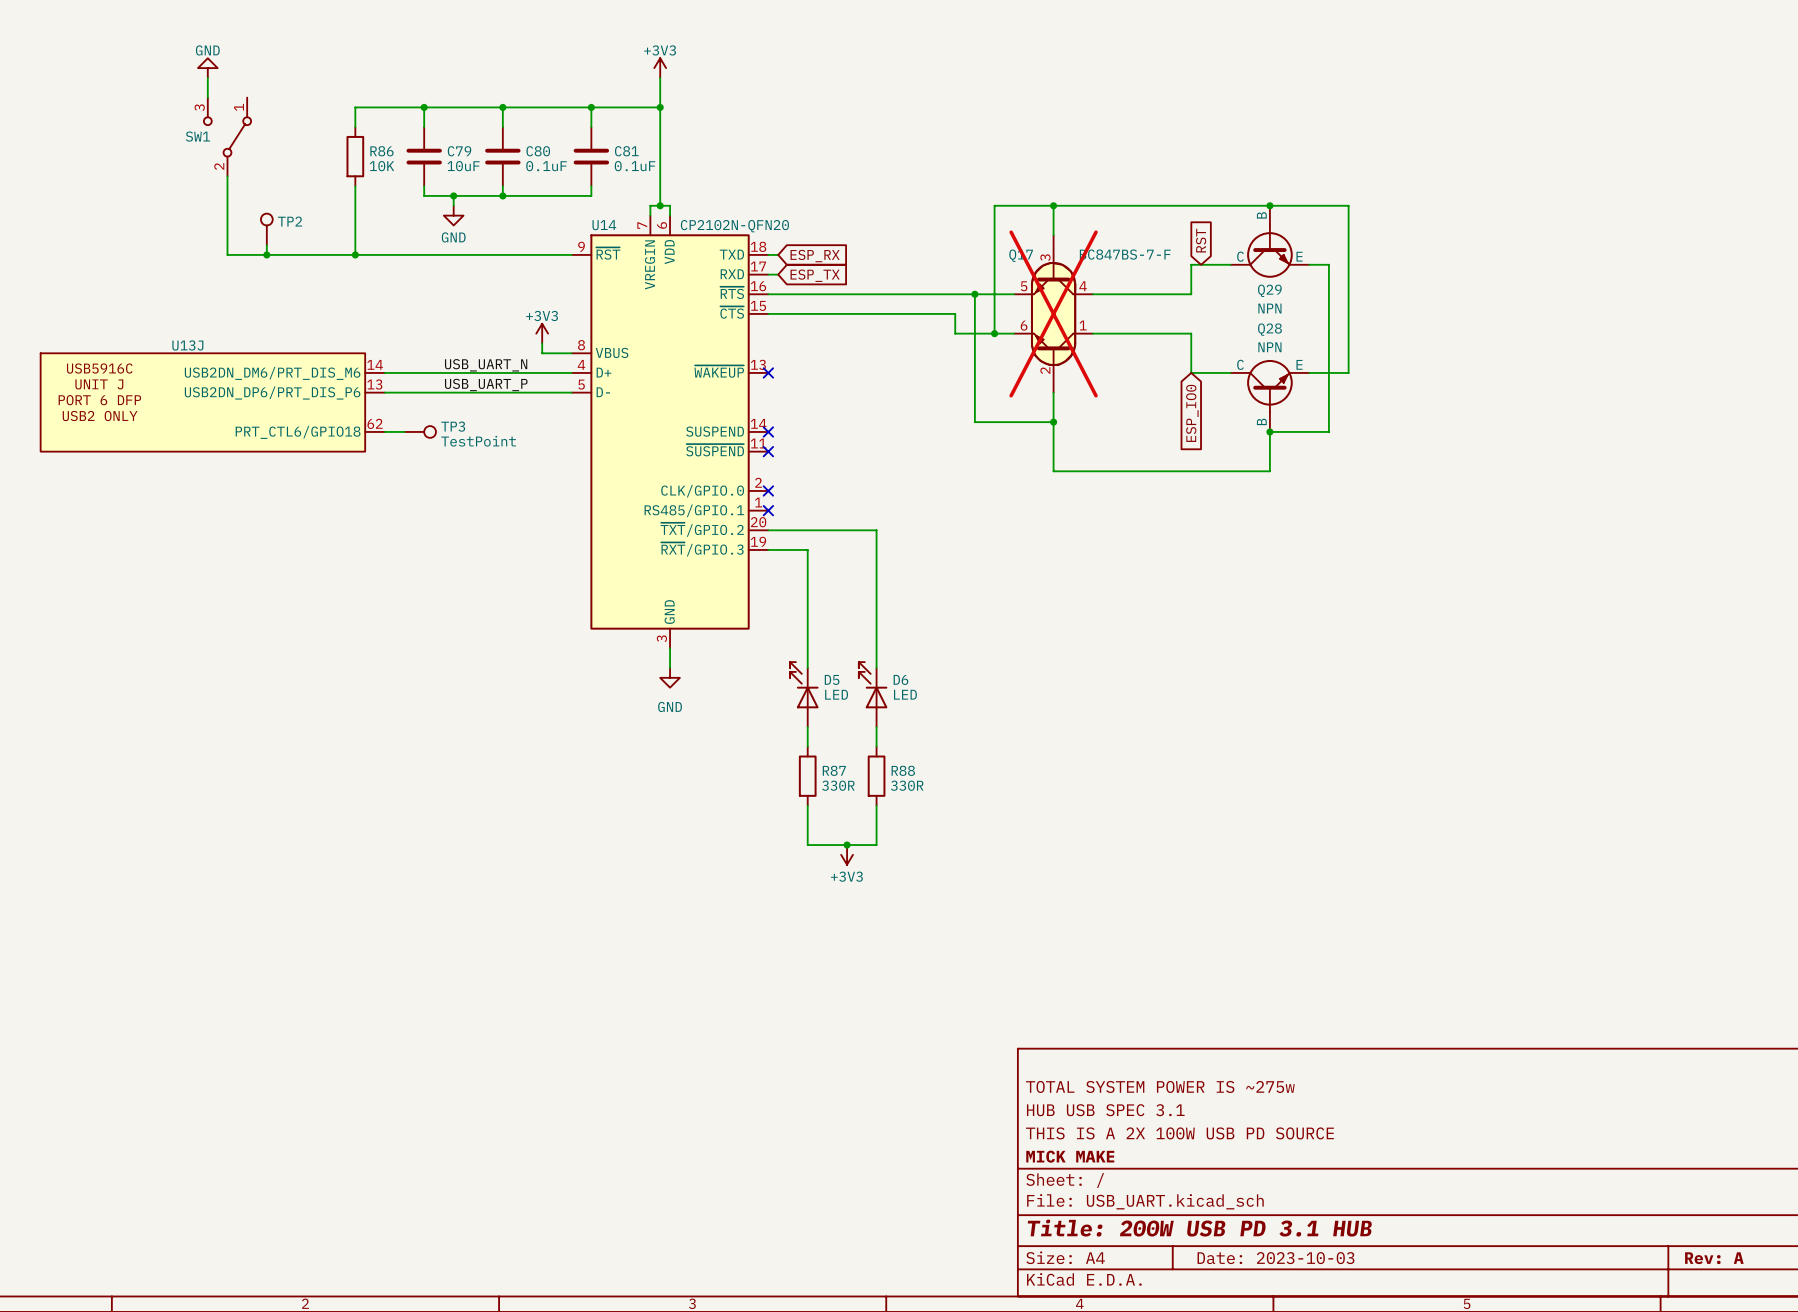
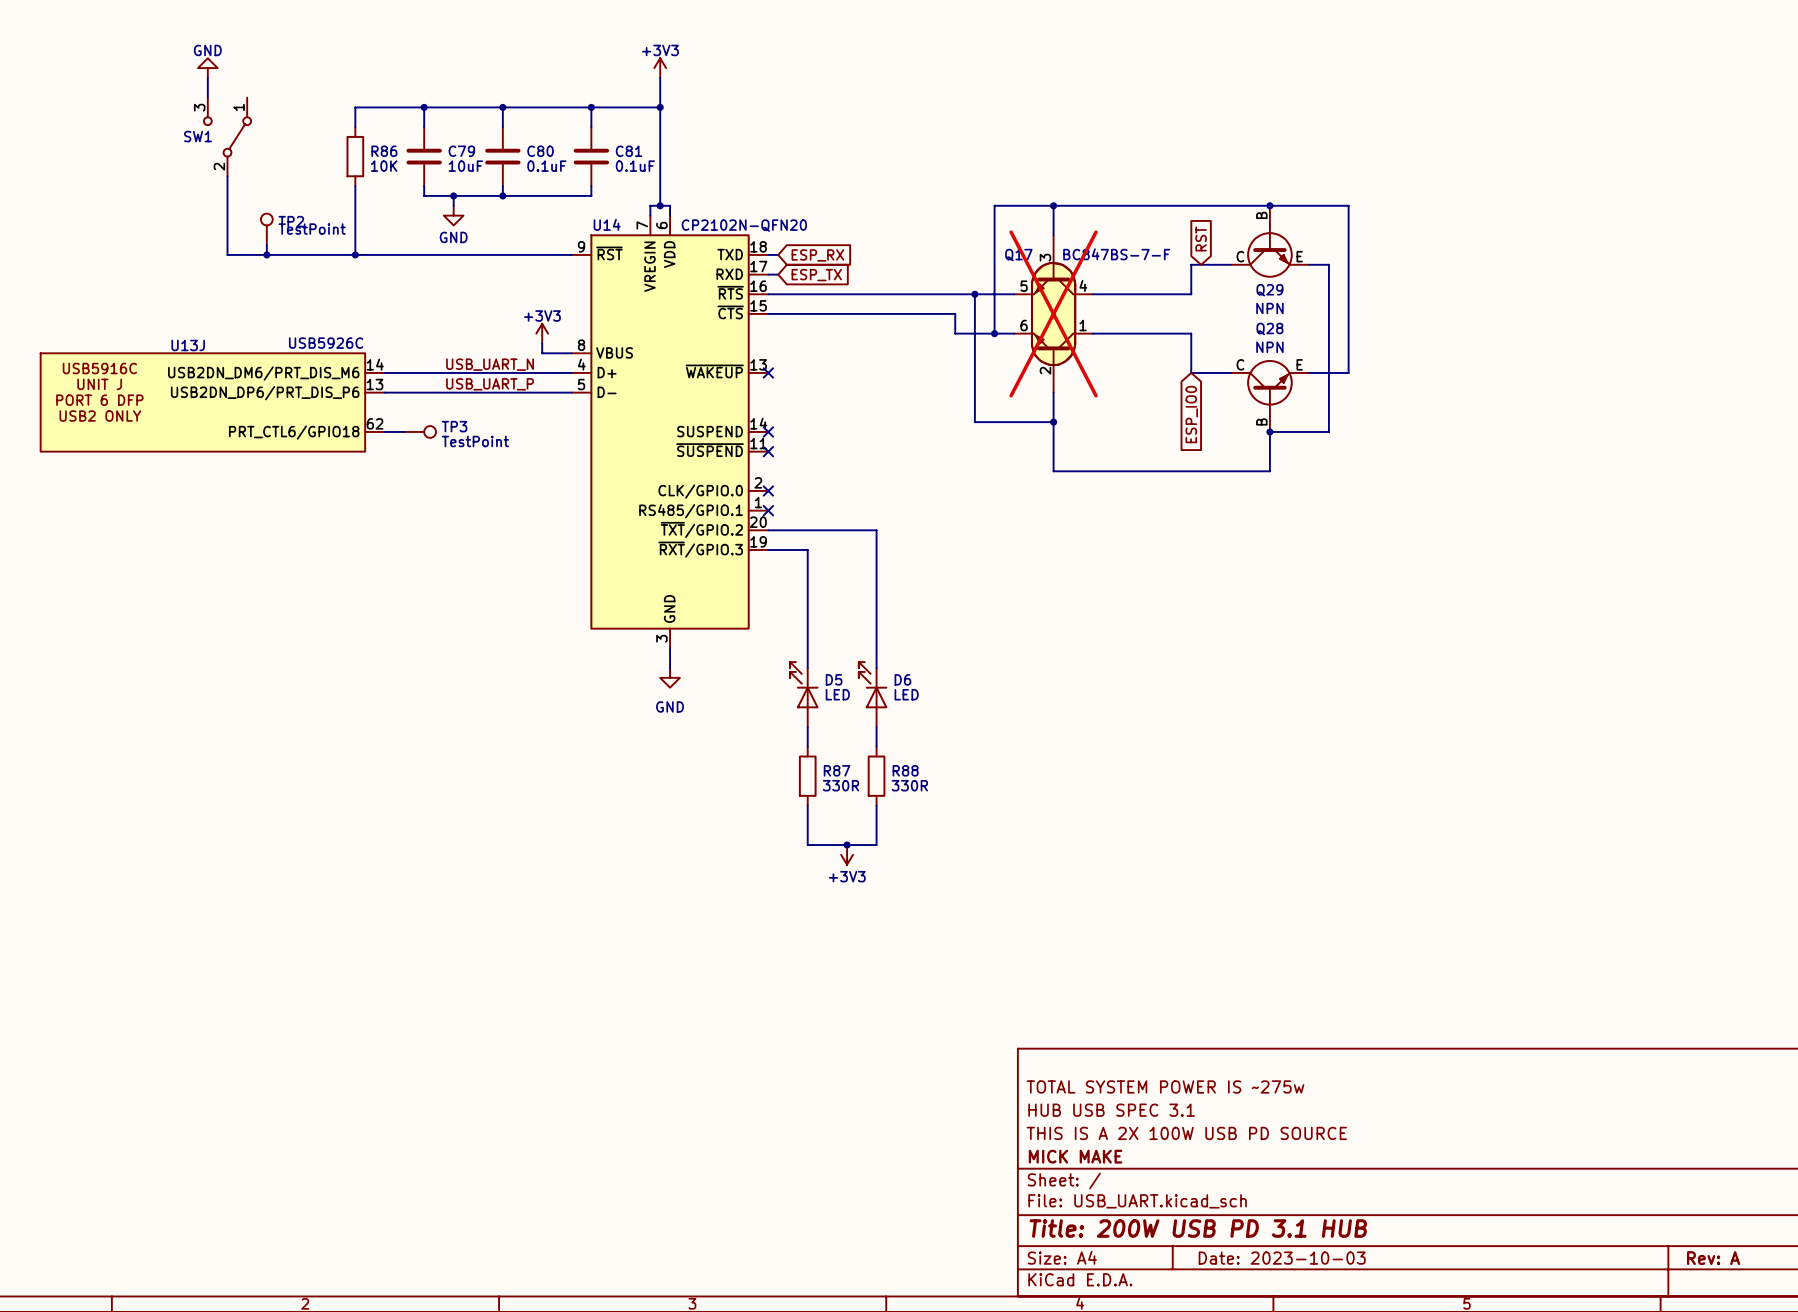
TP2 value: none -> TestPoint (312, 229)
U13J value: none -> USB5926C (326, 343)

